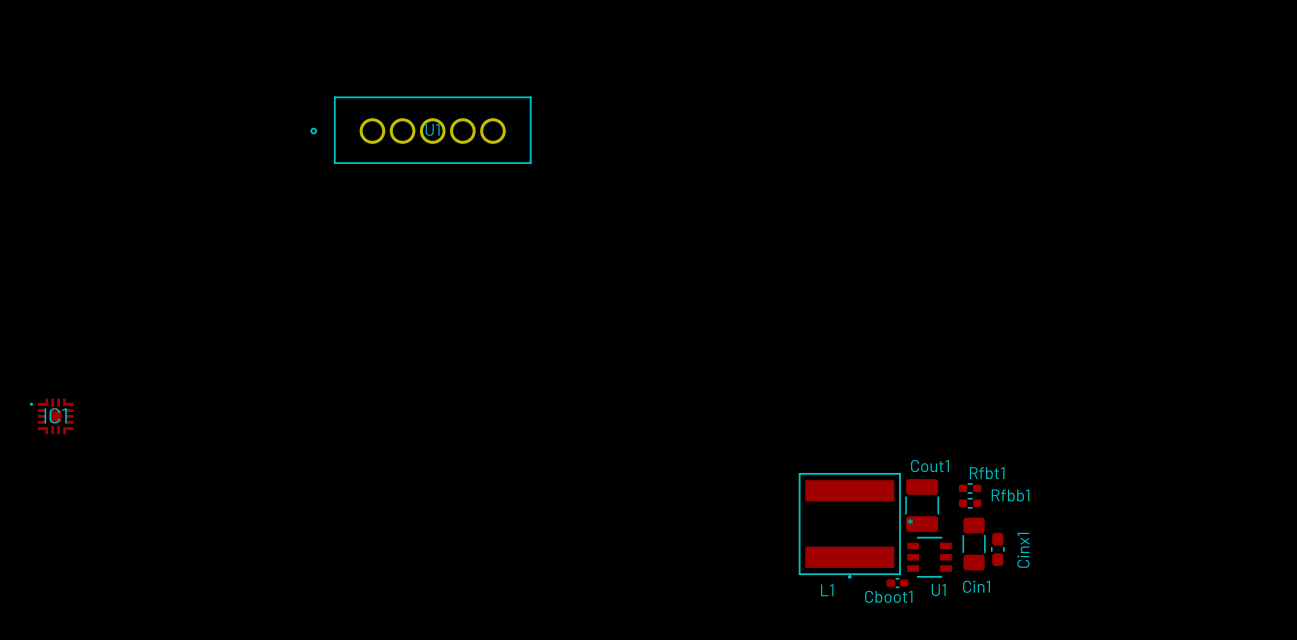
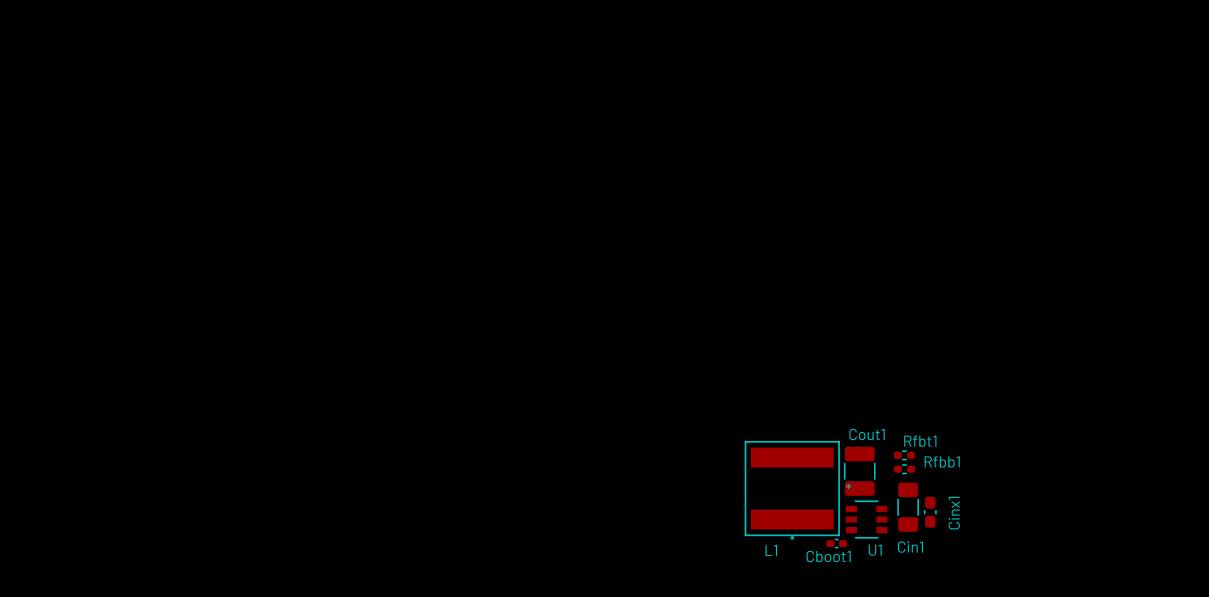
U1: (420, 130) -> none
IC1: (51, 416) -> none

